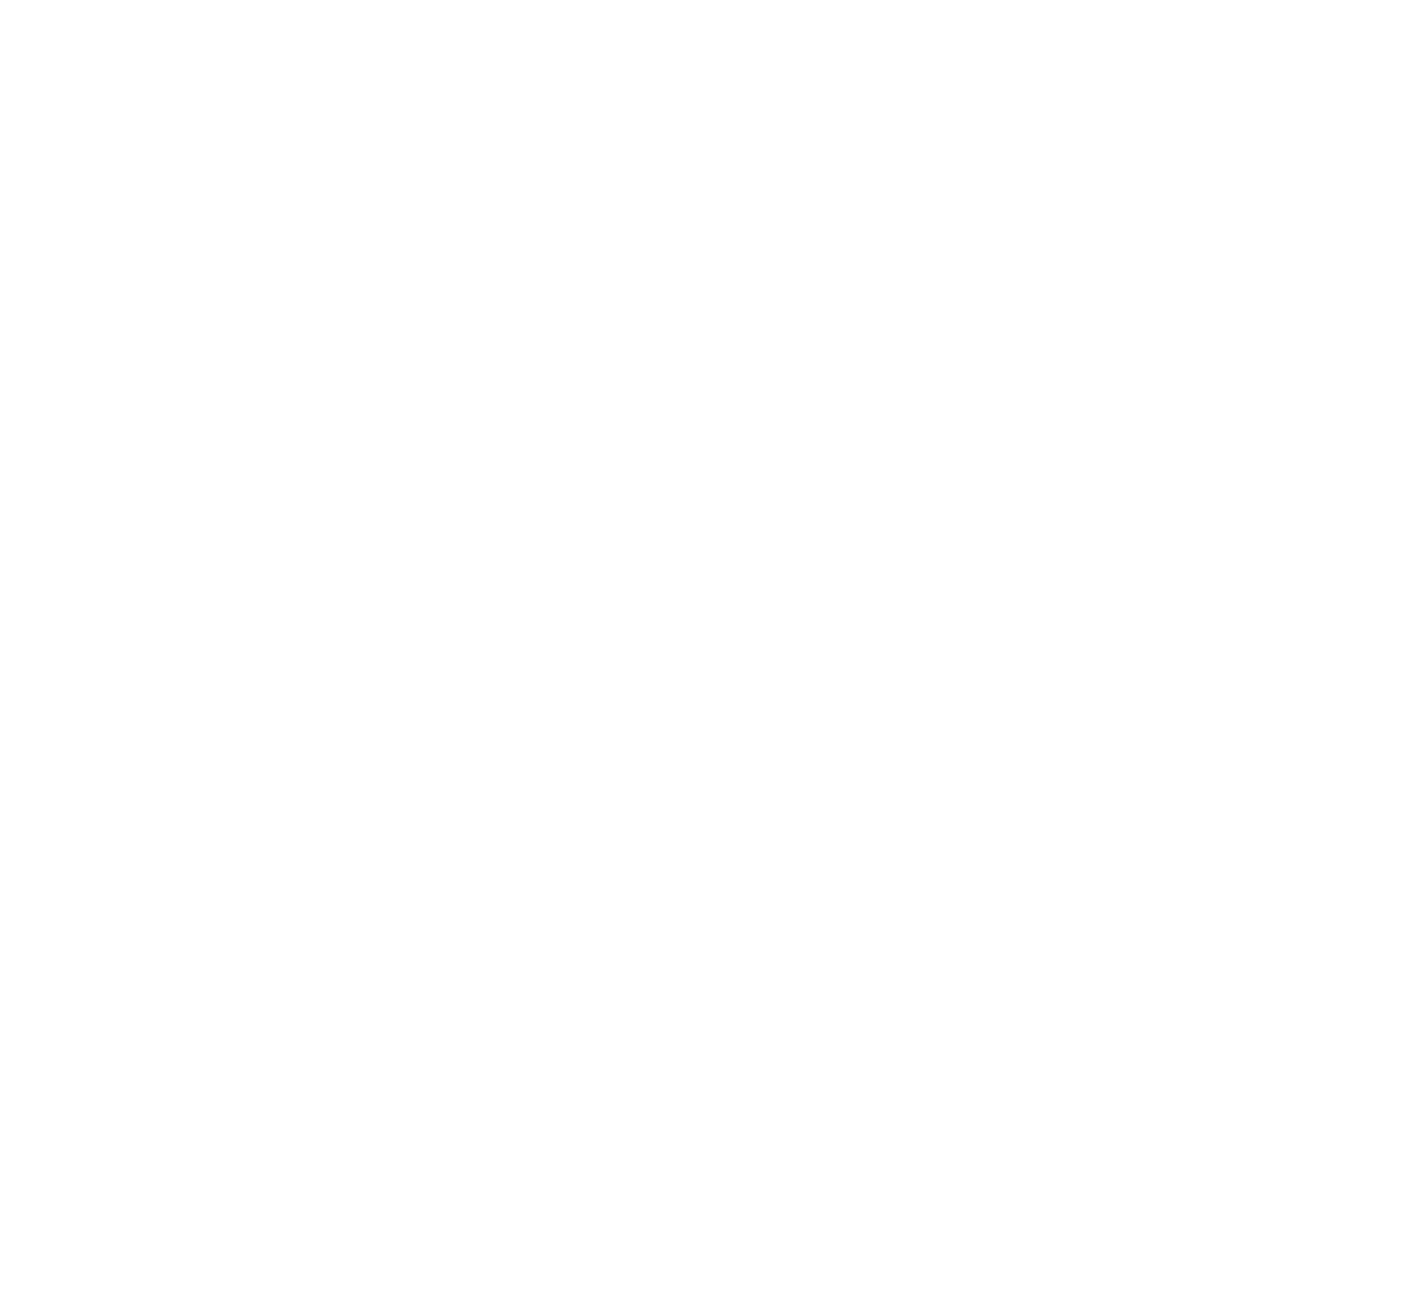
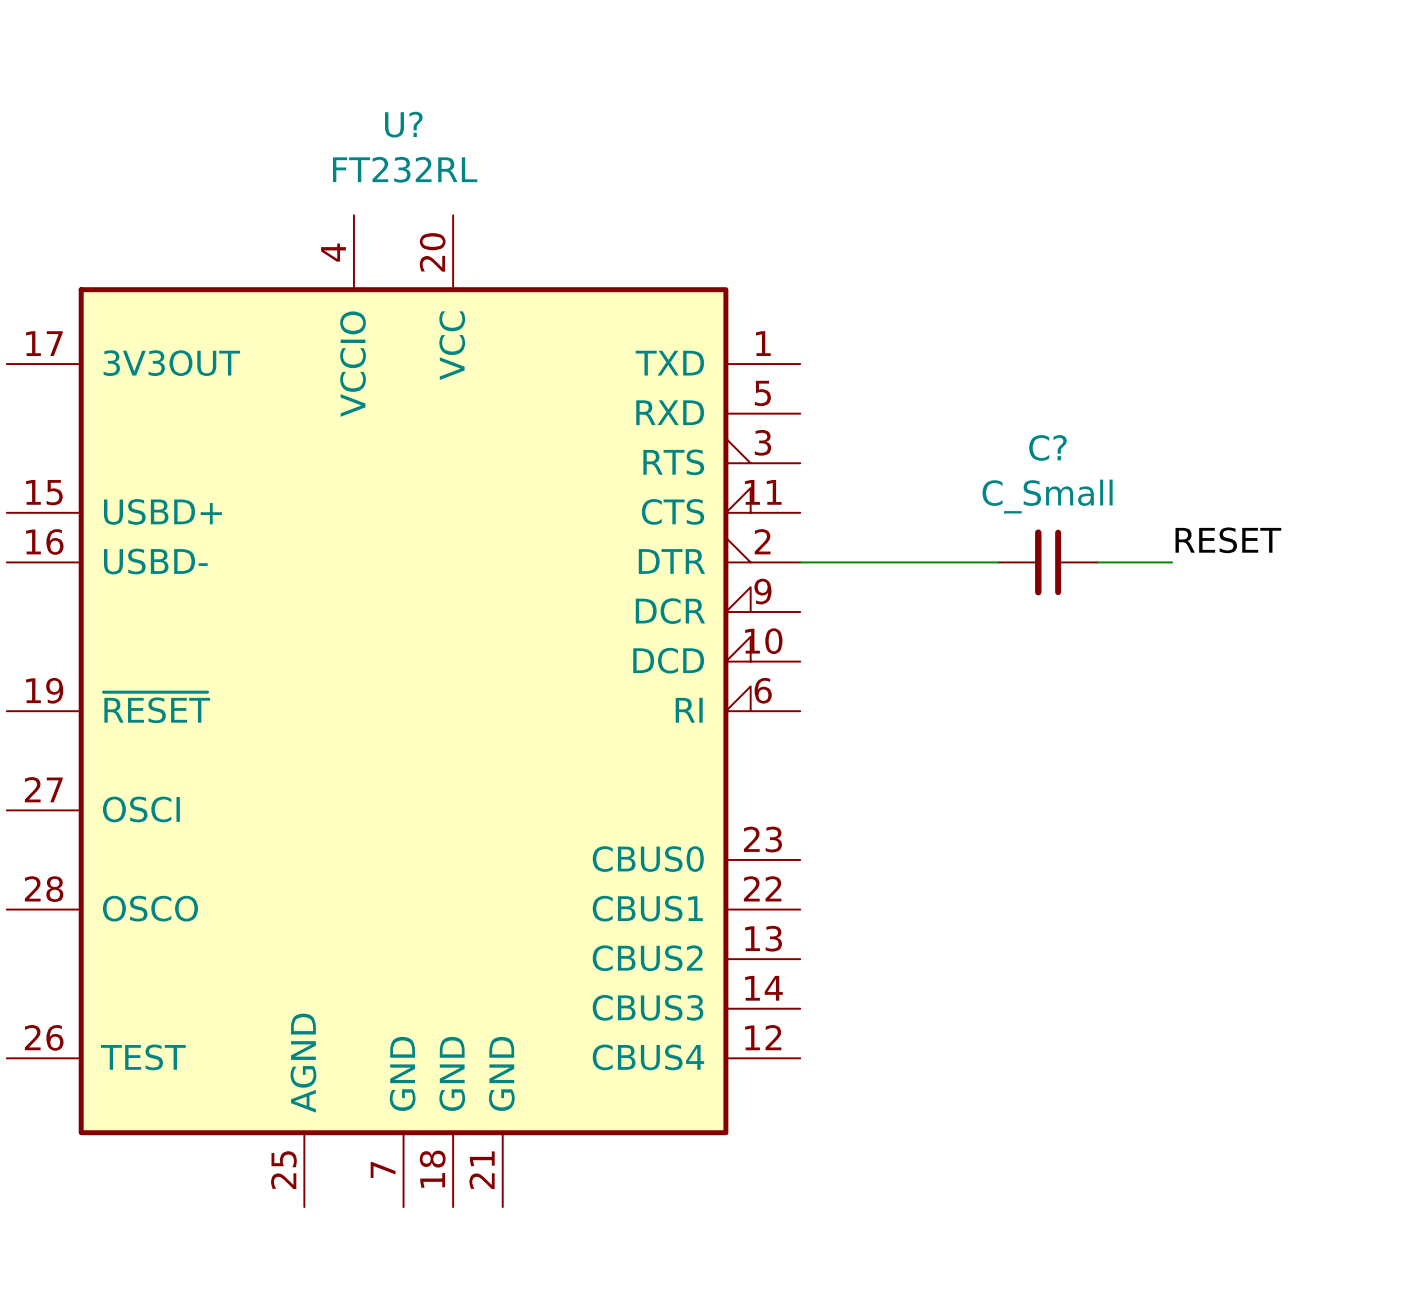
label: none -> RESET (1228, 540)
wire: none -> (800, 562) (998, 562)
C?: none -> C_Small (1048, 562)
wire: none -> (1097, 562) (1172, 562)
U?: none -> FT232RL (403, 711)

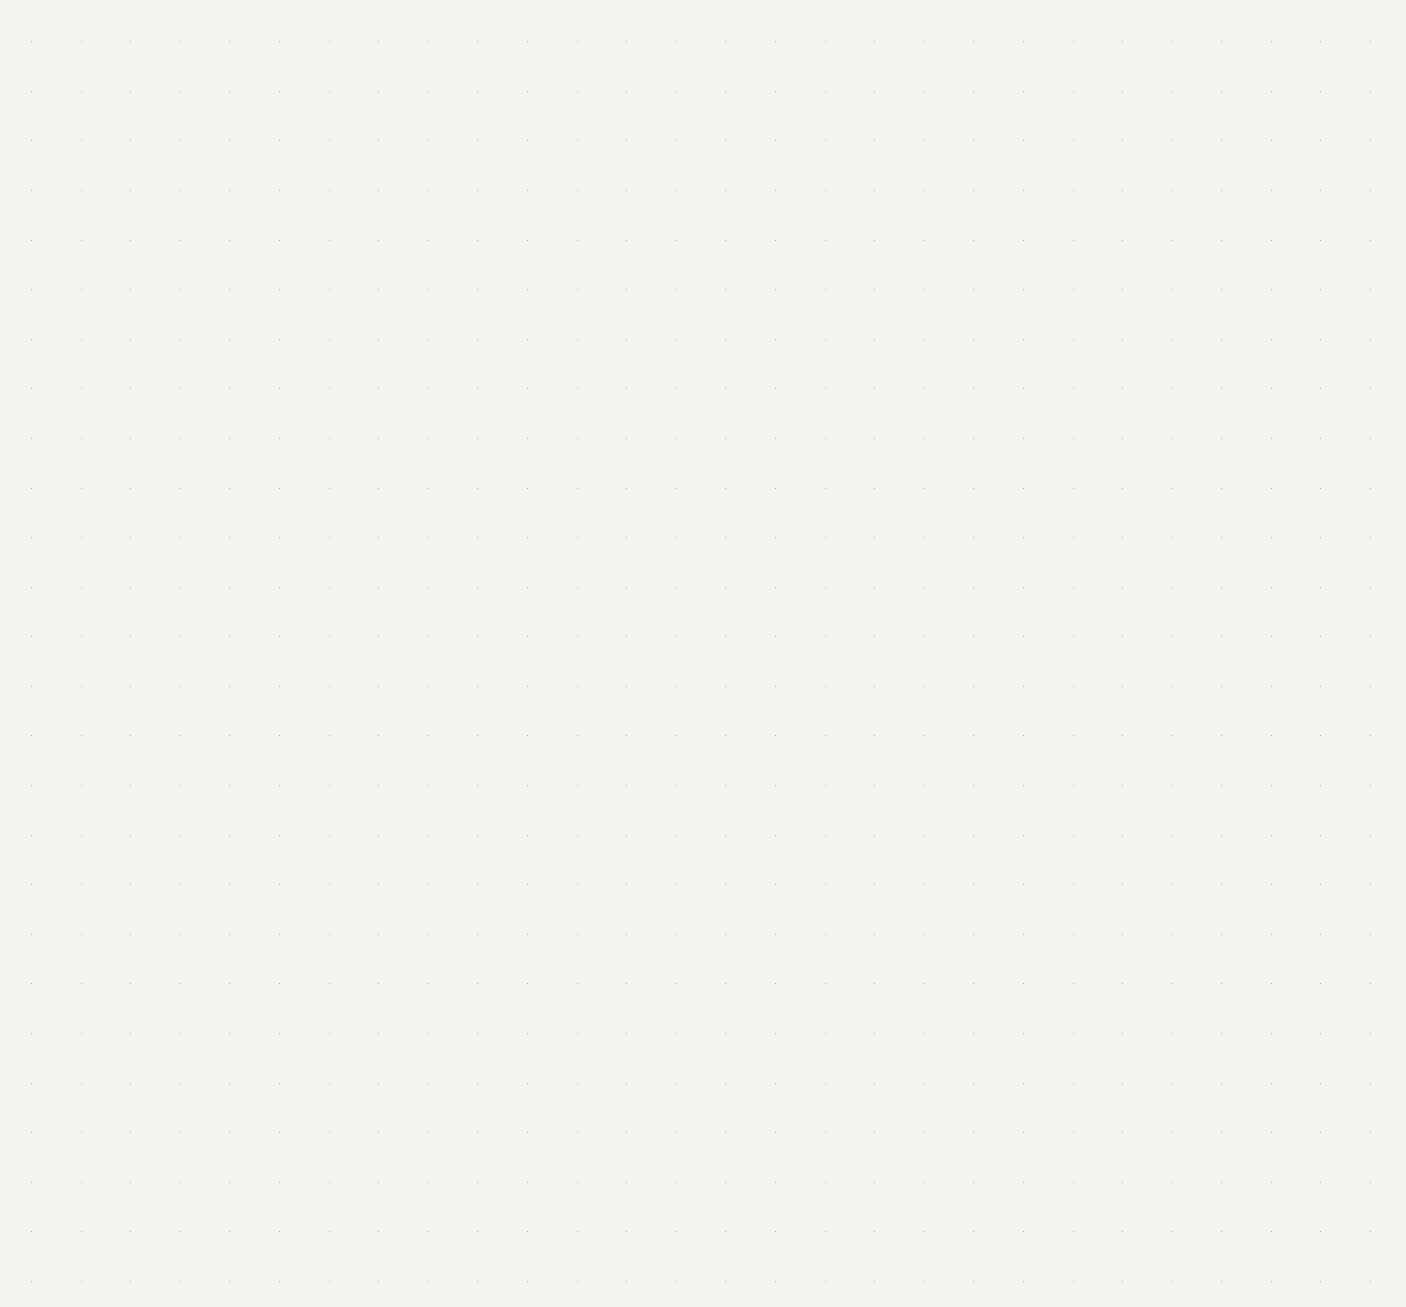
label: RESET (1228, 540) -> none
wire: (800, 562) (998, 562) -> none
C?: C_Small (1048, 562) -> none
wire: (1097, 562) (1172, 562) -> none
U?: FT232RL (403, 711) -> none

